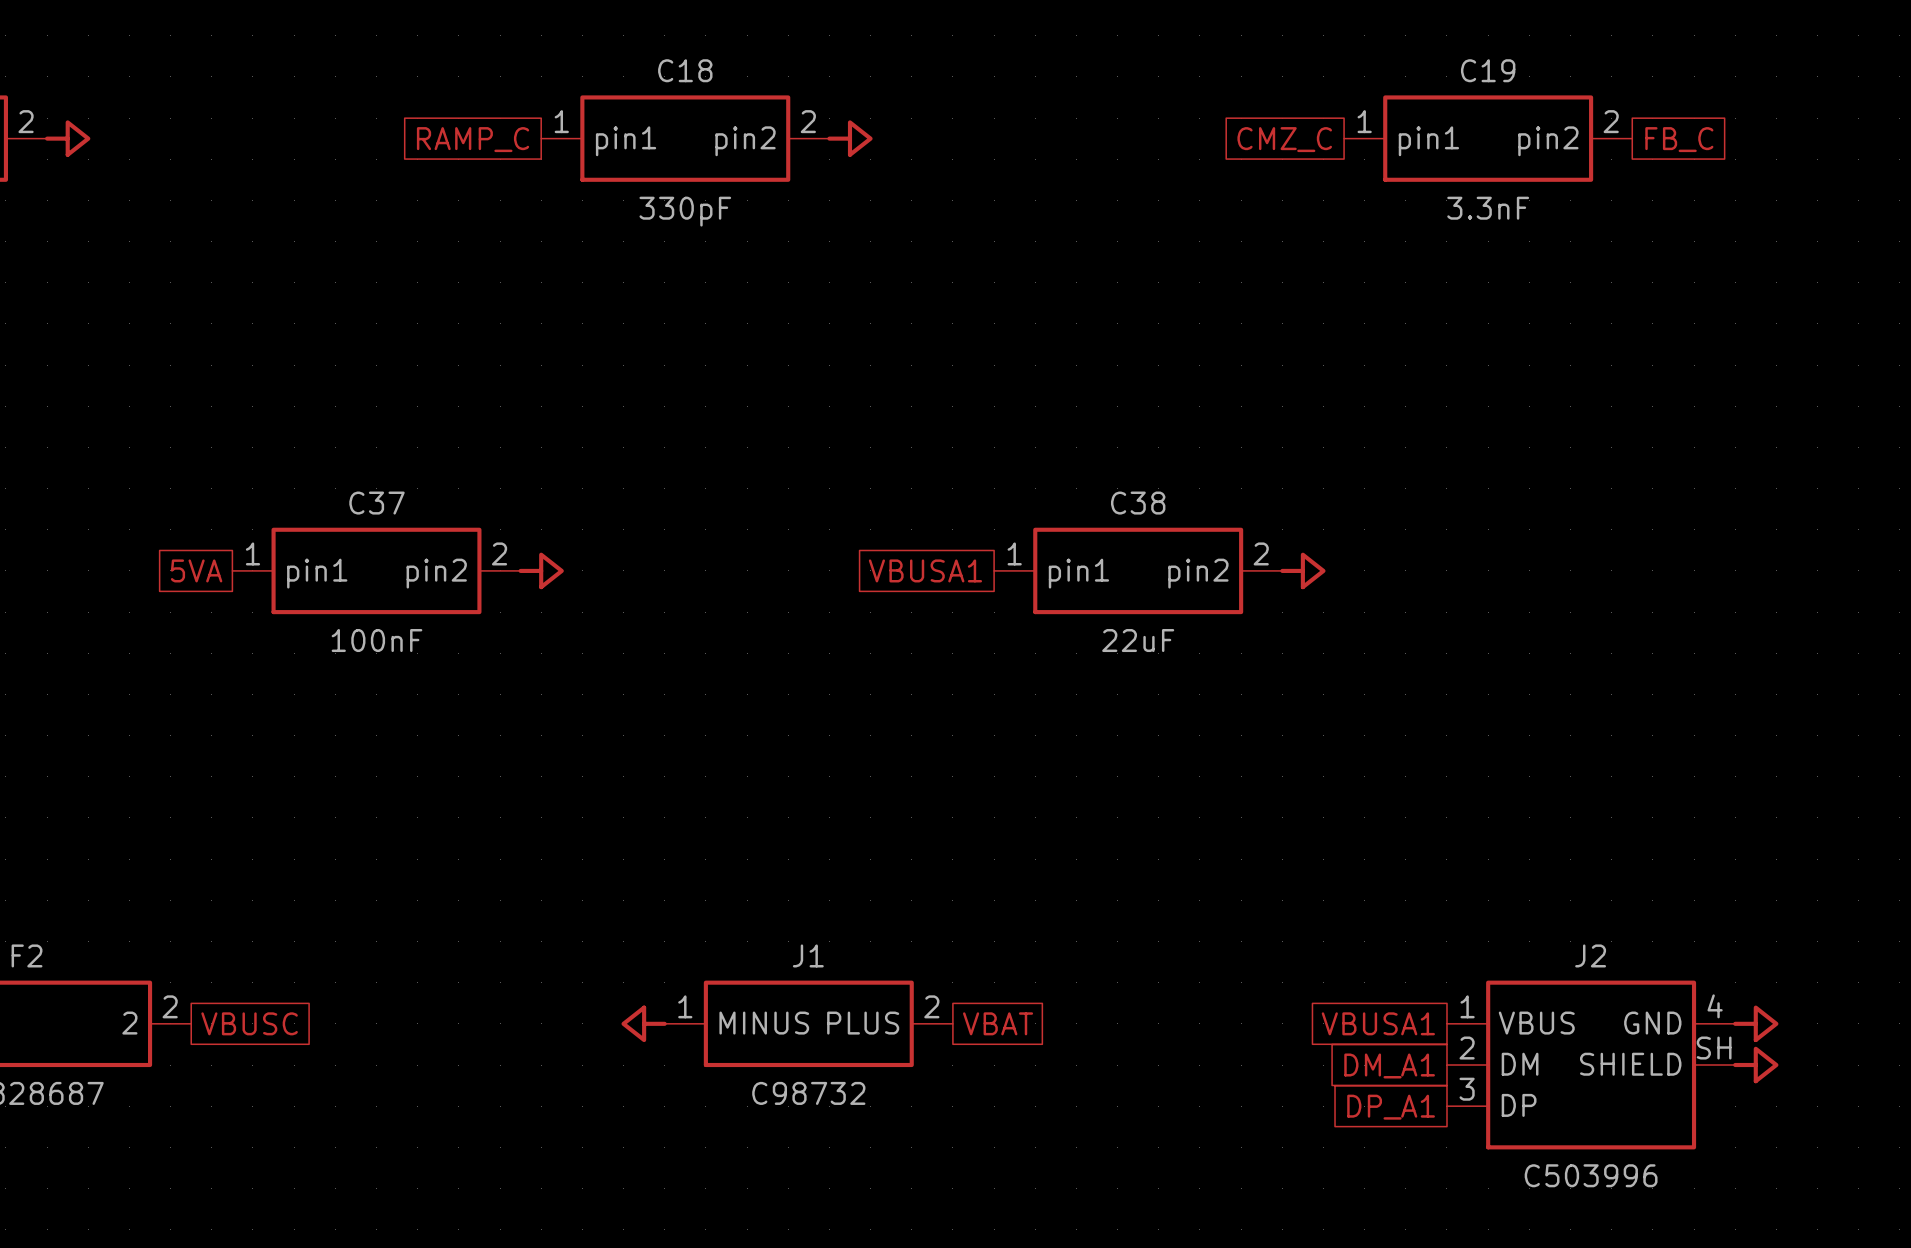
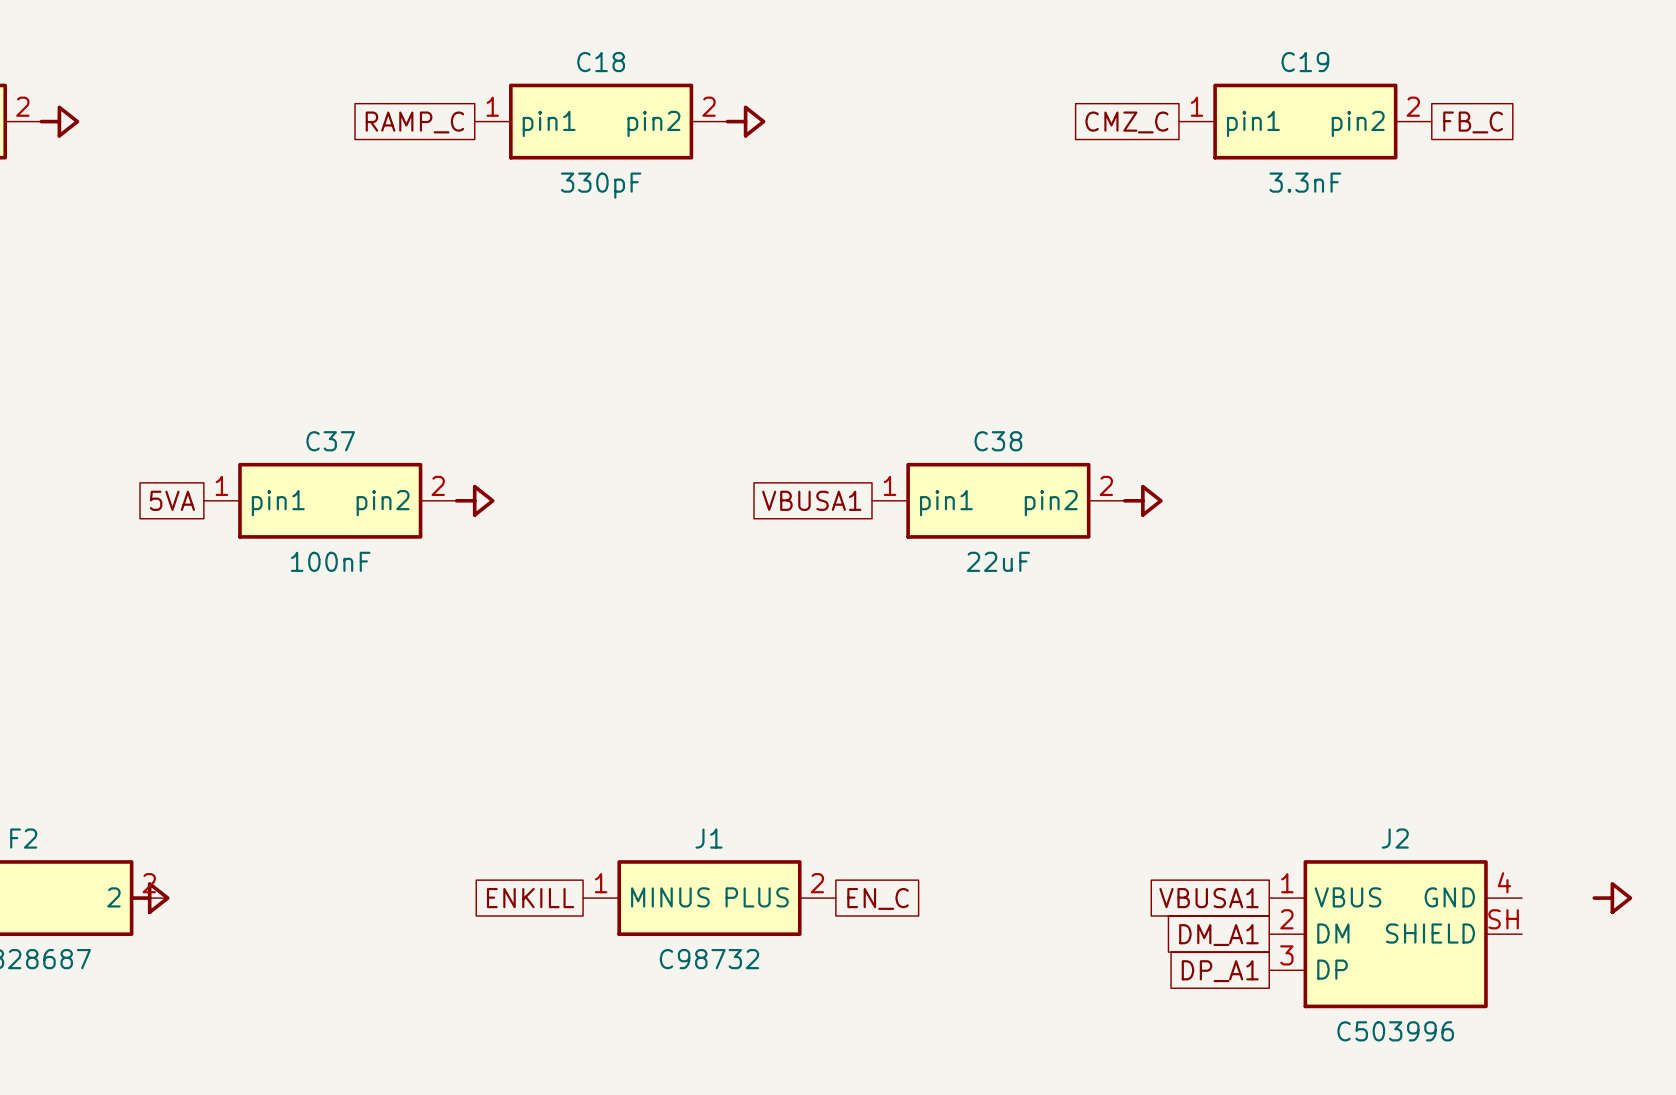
power symbol: none -> (149, 898)
global label: VBUSC (249, 1023) -> none
global label: none -> ENKILL (530, 898)
power symbol: (644, 1023) -> none
global label: VBAT (998, 1023) -> EN_C (878, 898)
power symbol: (1755, 1023) -> none
power symbol: none -> (1612, 898)
power symbol: (1755, 1065) -> none

